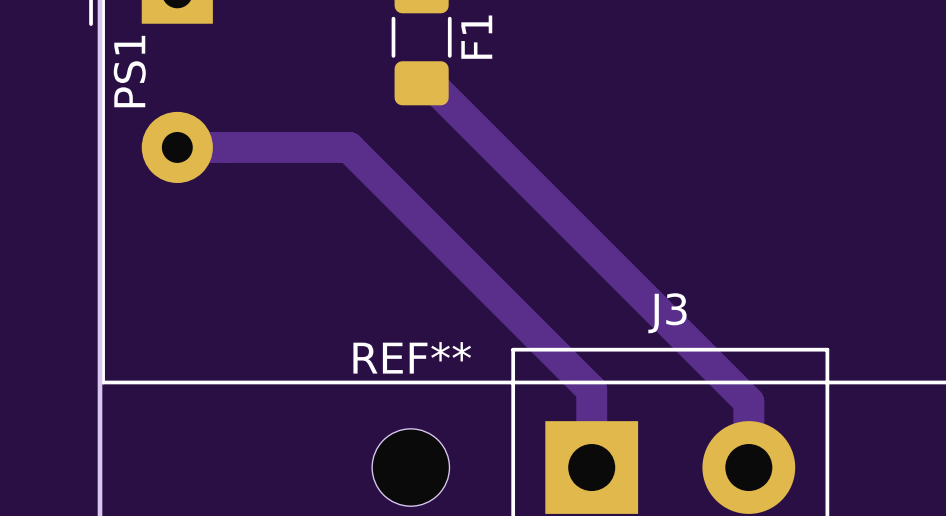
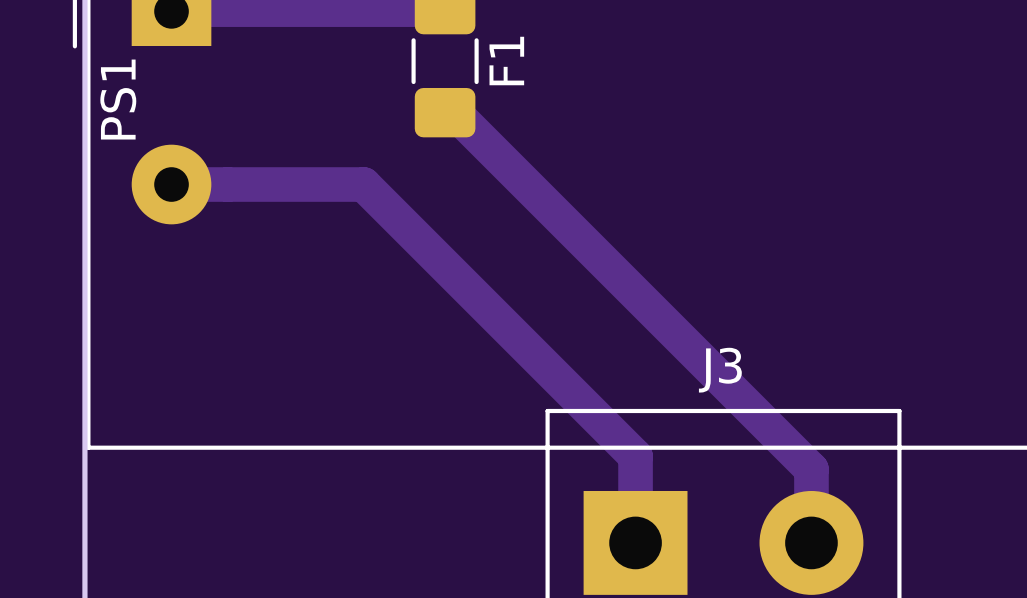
REF**: (410, 467) -> none

